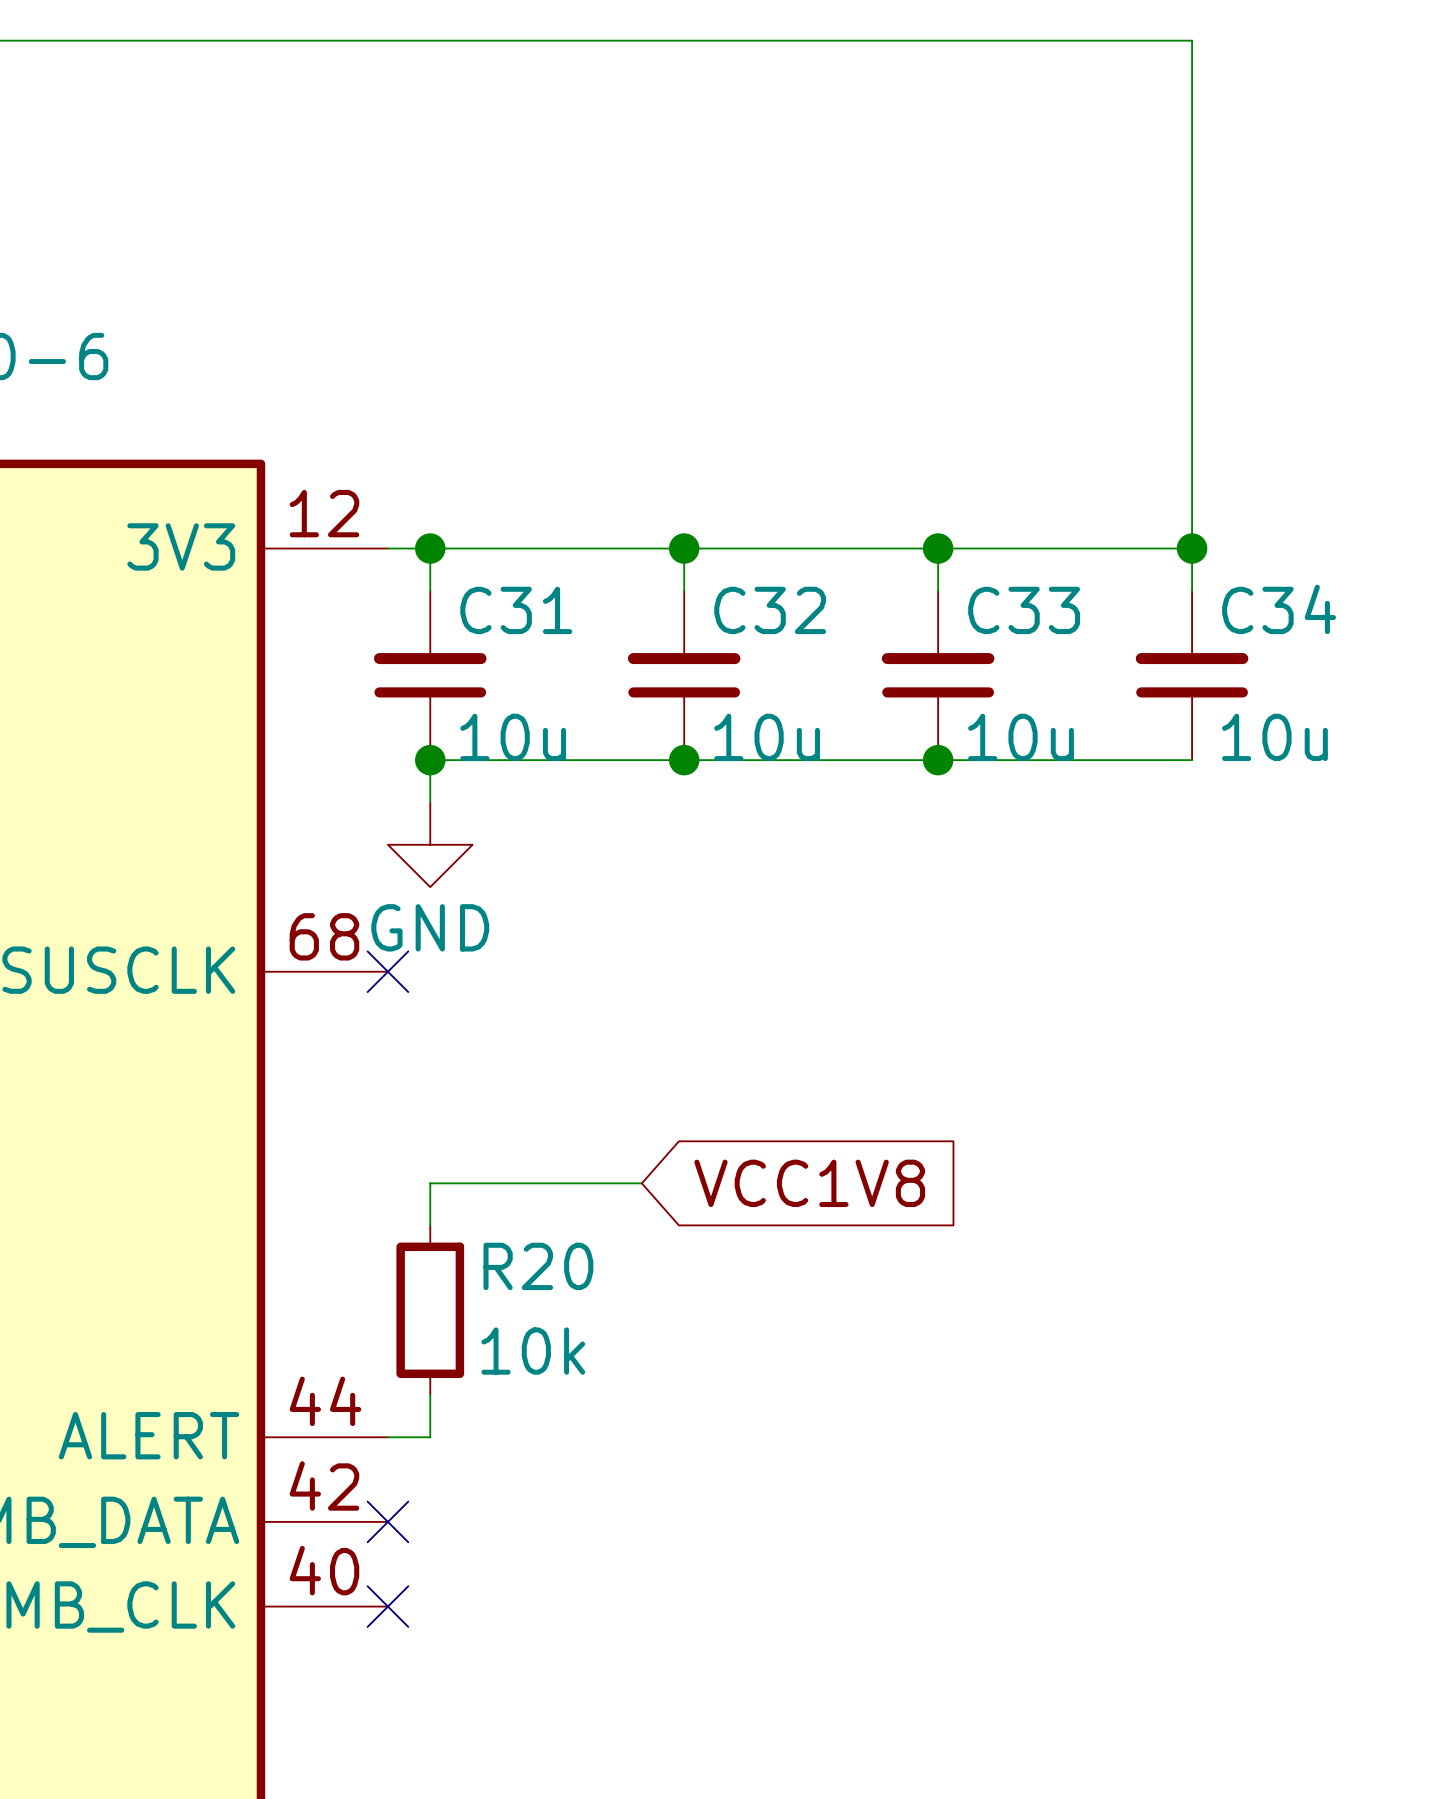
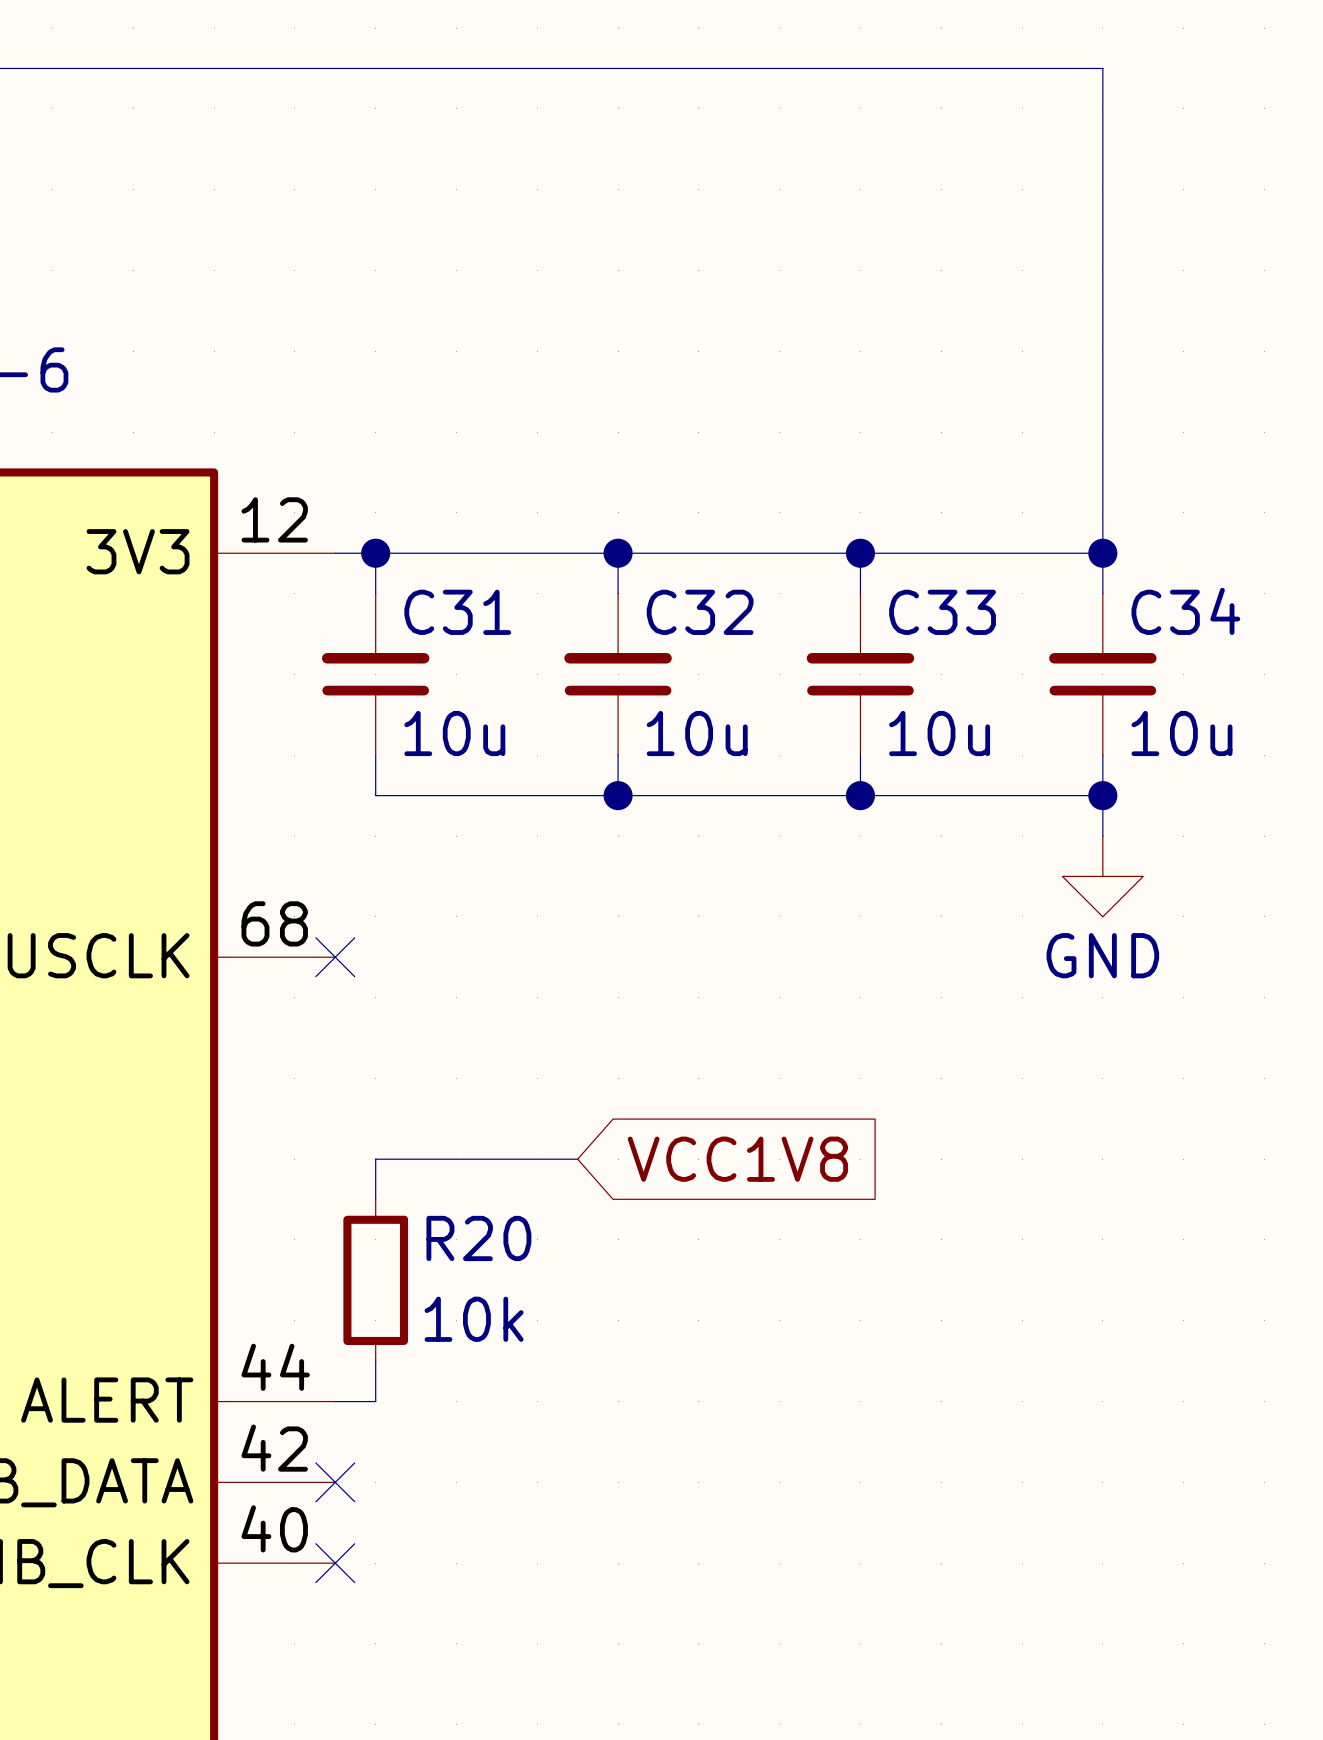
wire: (430, 760) (1192, 760) -> (1102, 836) (1102, 755)
junction: (430, 760) -> none
wire: none -> (618, 755) (618, 795)
junction position: (684, 760) -> (618, 795)
wire: none -> (860, 755) (860, 795)
junction position: (938, 760) -> (860, 795)
wire: none -> (375, 795) (1102, 795)
junction: none -> (1102, 795)
power symbol position: GND (430, 844) -> GND (1102, 876)

